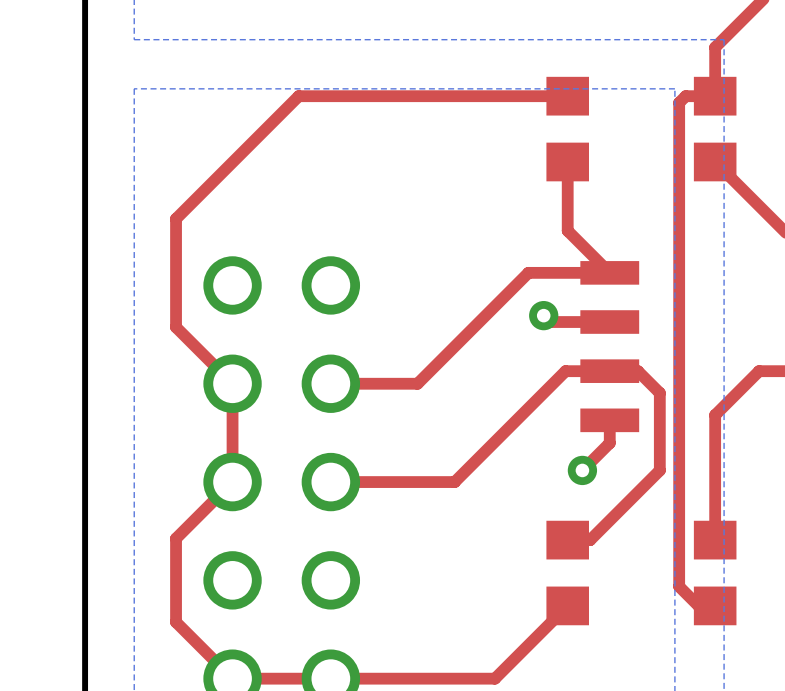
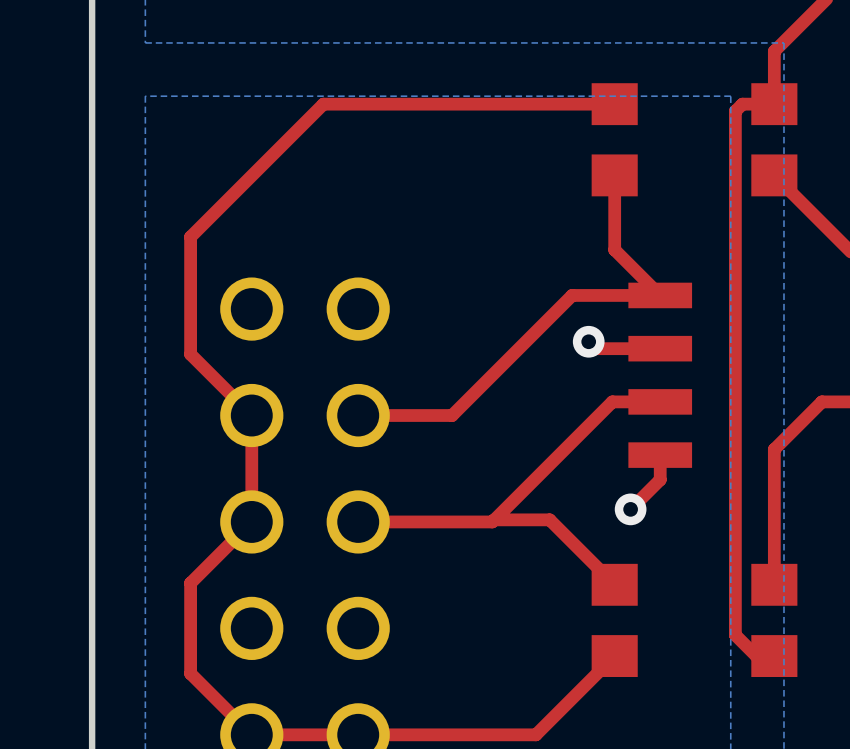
top track: (609, 371) (637, 371) (659, 393) (659, 470) (590, 540) (567, 540) -> (494, 519) (549, 519) (614, 584)

